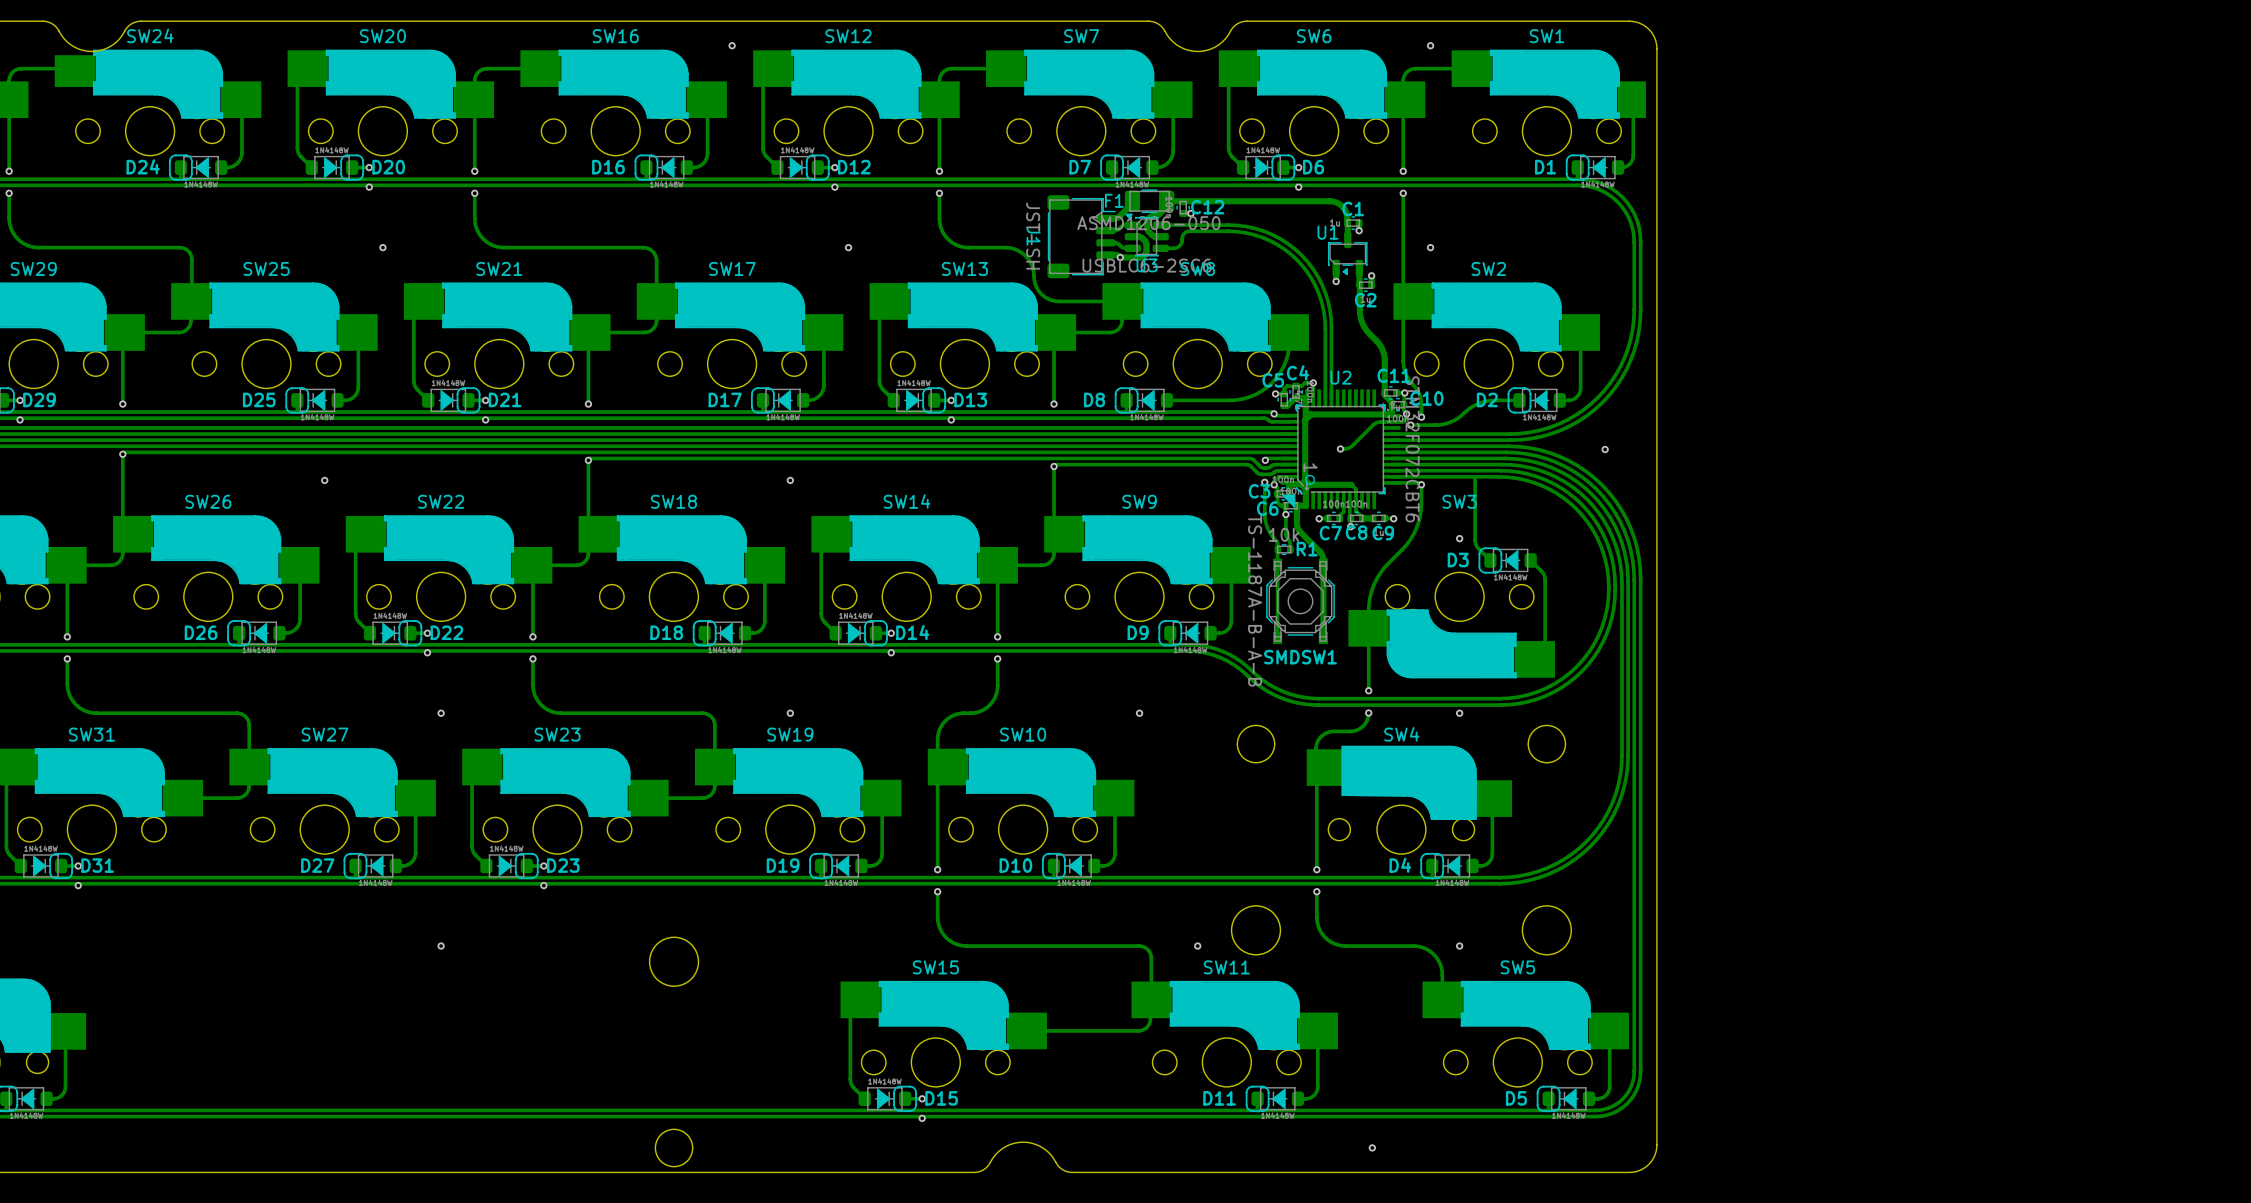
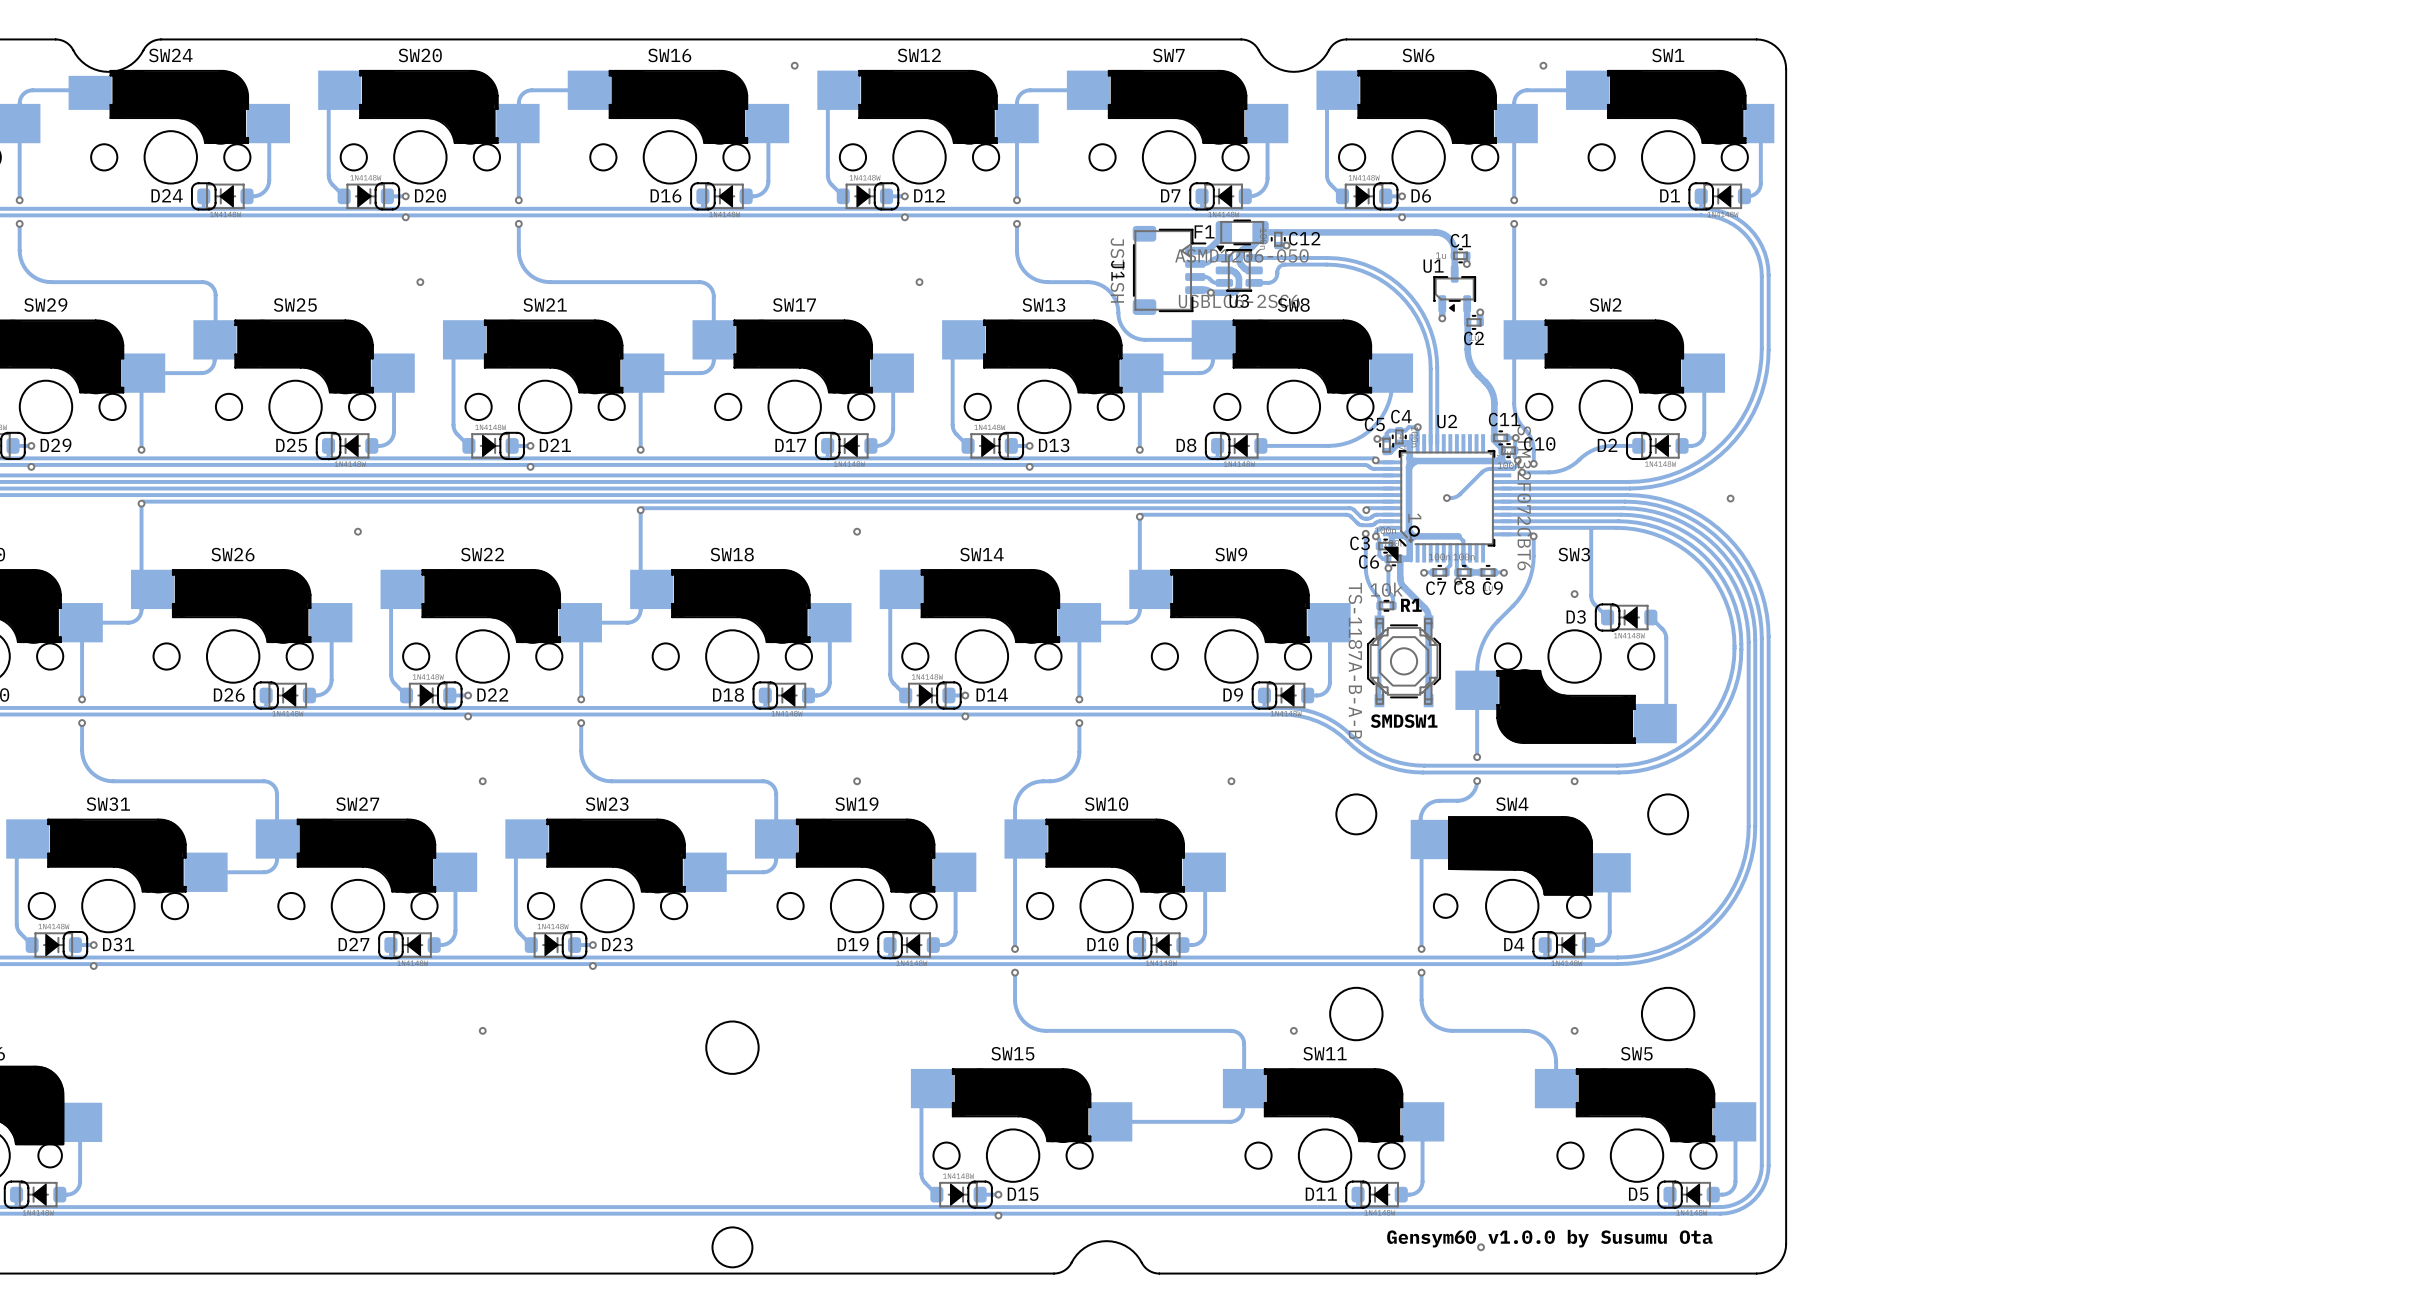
text: none -> Gensym60 v1.0.0 by Susumu Ota (1549, 1238)

